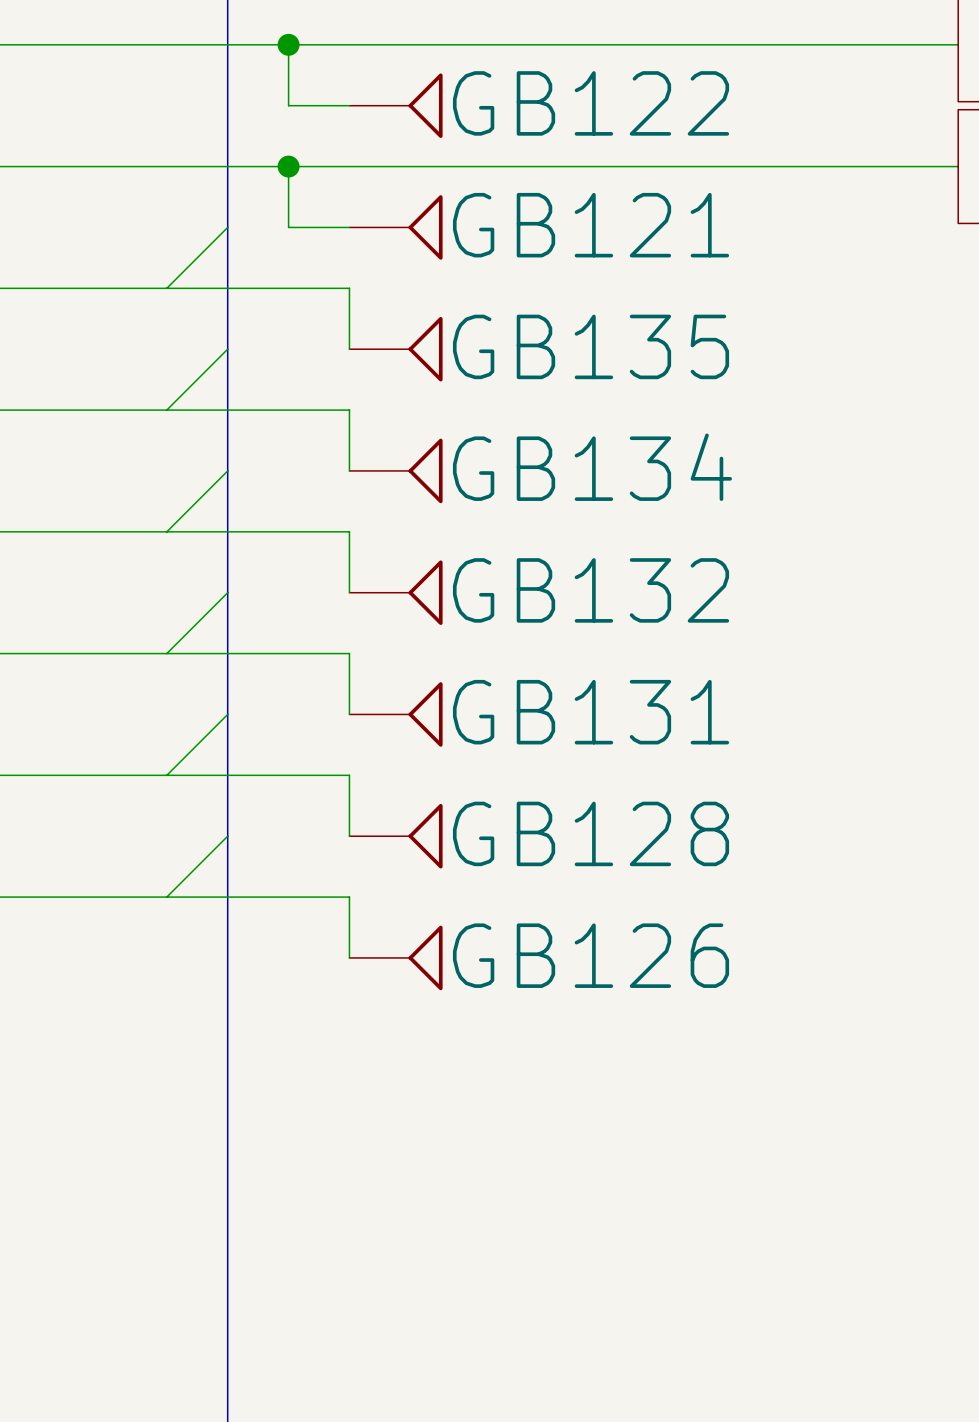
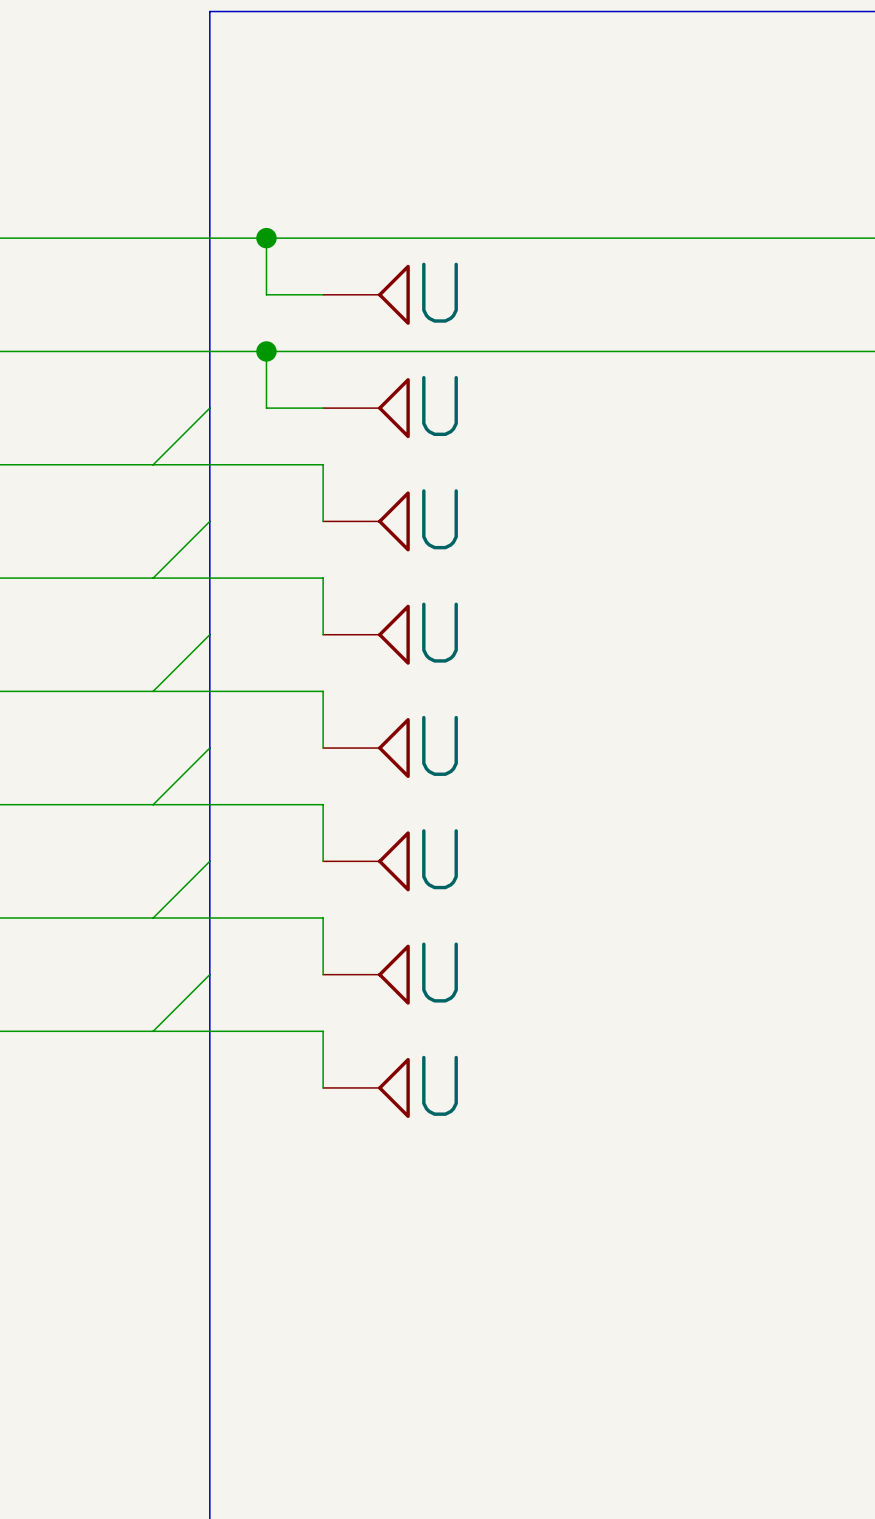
GB122 name: GB122 (591, 103) -> U (440, 292)
GB121 name: GB121 (591, 225) -> U (440, 405)
GB135 name: GB135 (591, 346) -> U (440, 519)
GB134 name: GB134 (592, 467) -> U (440, 632)
GB132 name: GB132 (591, 590) -> U (440, 745)
GB131 name: GB131 (591, 712) -> U (440, 859)
GB128 name: GB128 (591, 833) -> U (440, 972)
GB126 name: GB126 (591, 955) -> U (440, 1085)

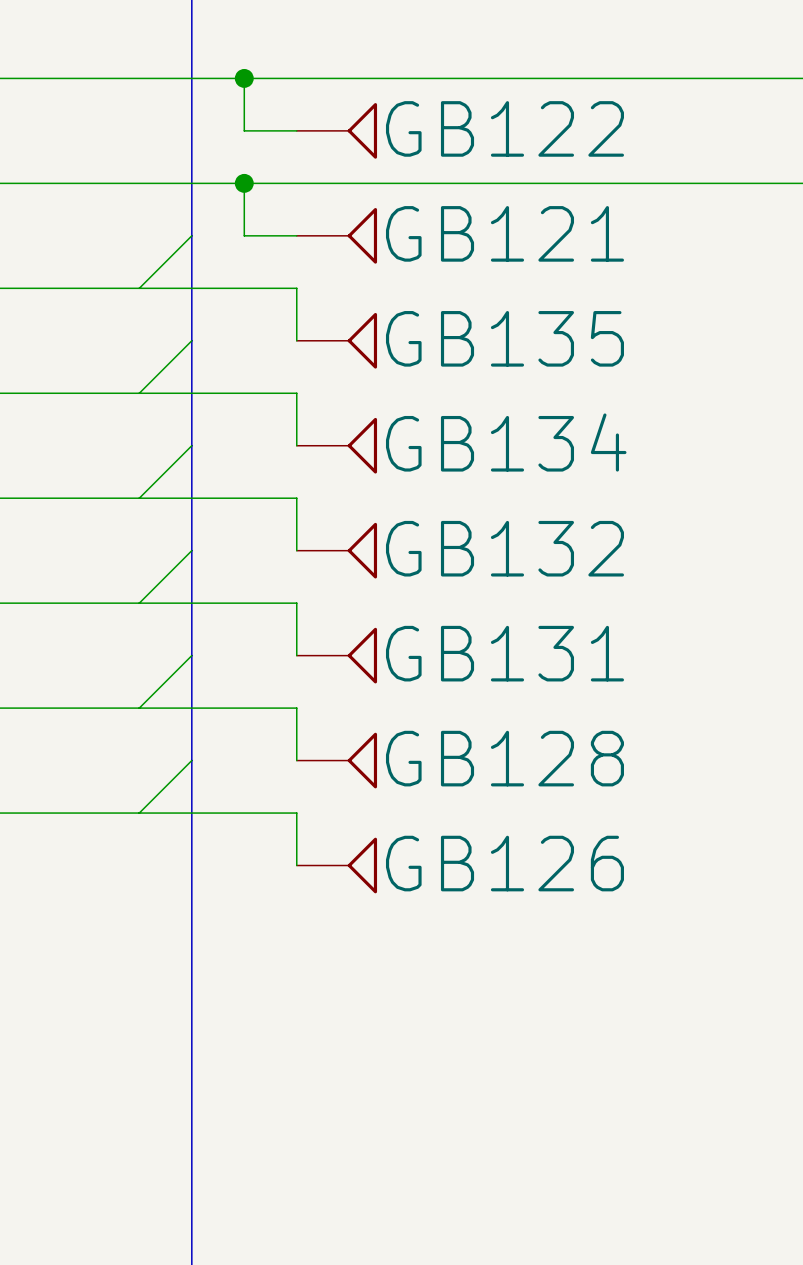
U name: U (440, 292) -> GB122 (504, 128)
U name: U (440, 405) -> GB121 (504, 233)
U name: U (440, 519) -> GB135 (504, 338)
U name: U (440, 632) -> GB134 (506, 442)
U name: U (440, 745) -> GB132 (504, 548)
U name: U (440, 859) -> GB131 (504, 653)
U name: U (440, 972) -> GB128 (504, 758)
U name: U (440, 1085) -> GB126 (504, 863)

